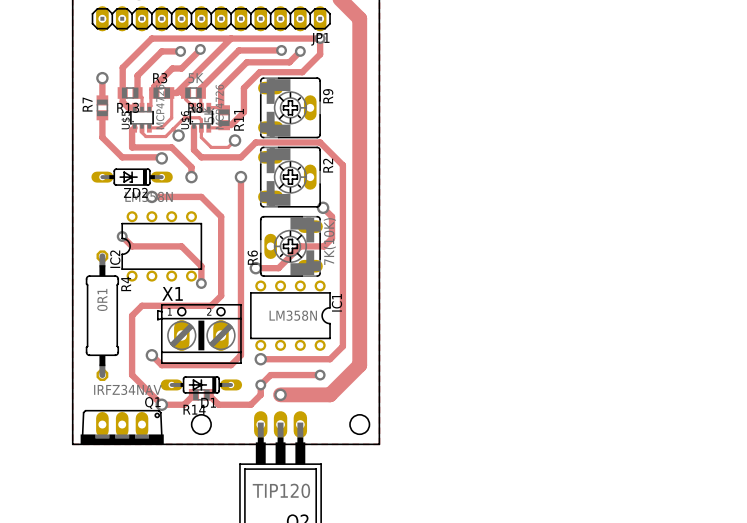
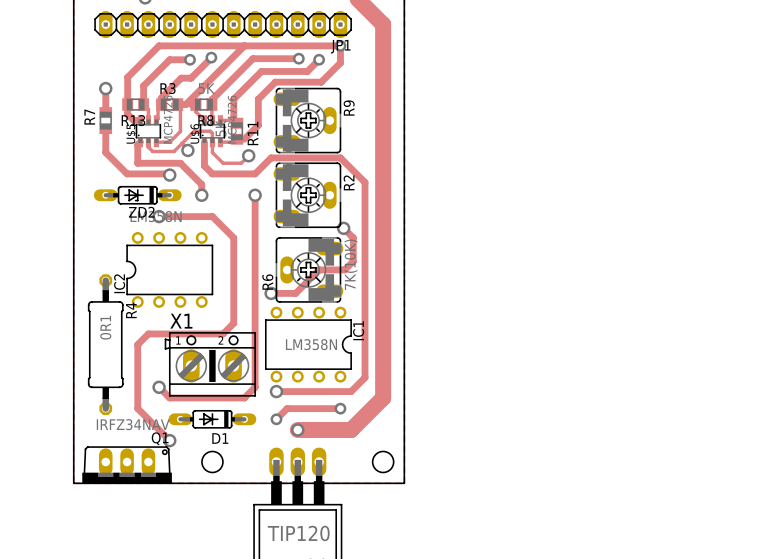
track: (122, 236) (132, 246) (181, 246) (201, 266) (201, 283) -> none
via: (122, 236) -> none
via: (201, 283) -> none
track: (260, 384) (260, 394) (250, 404) (218, 404) (208, 394) -> none
track: (193, 394) (184, 404) (161, 404) -> none
R14: (201, 394) -> none

